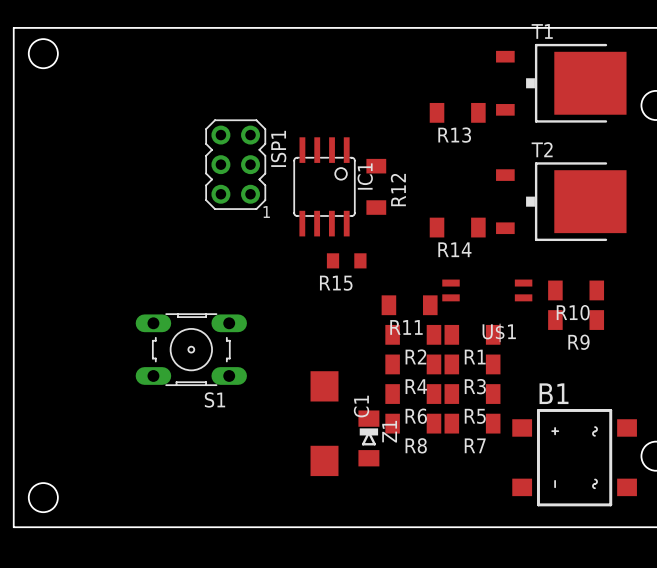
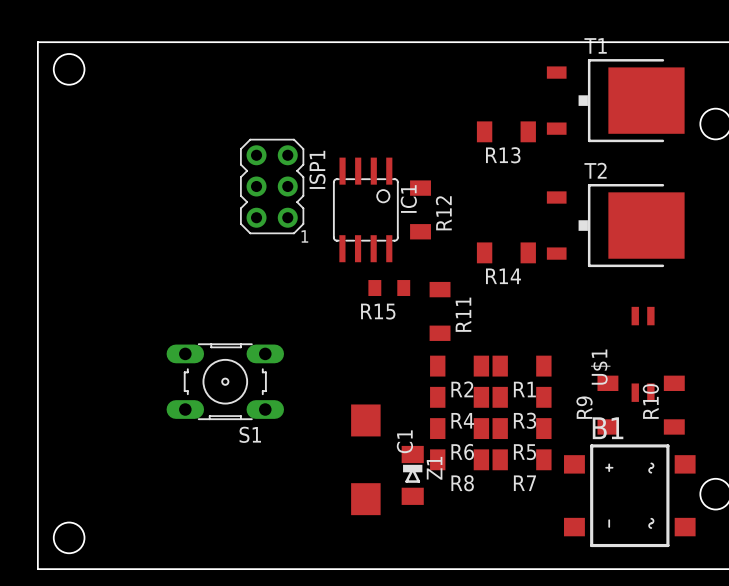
U$1 rotation: 0° (487, 290) -> 90° clockwise (643, 354)
U$1 position: (487, 290) -> (643, 354)
R10 rotation: 0° (576, 290) -> 90° clockwise (674, 405)
R10 position: (576, 290) -> (674, 405)
R11 rotation: 0° (409, 305) -> 90° clockwise (440, 311)
R9 rotation: 0° (576, 320) -> 90° clockwise (607, 405)
R9 position: (576, 320) -> (607, 405)
R11 name position: R11 (406, 327) -> R11 (463, 314)

